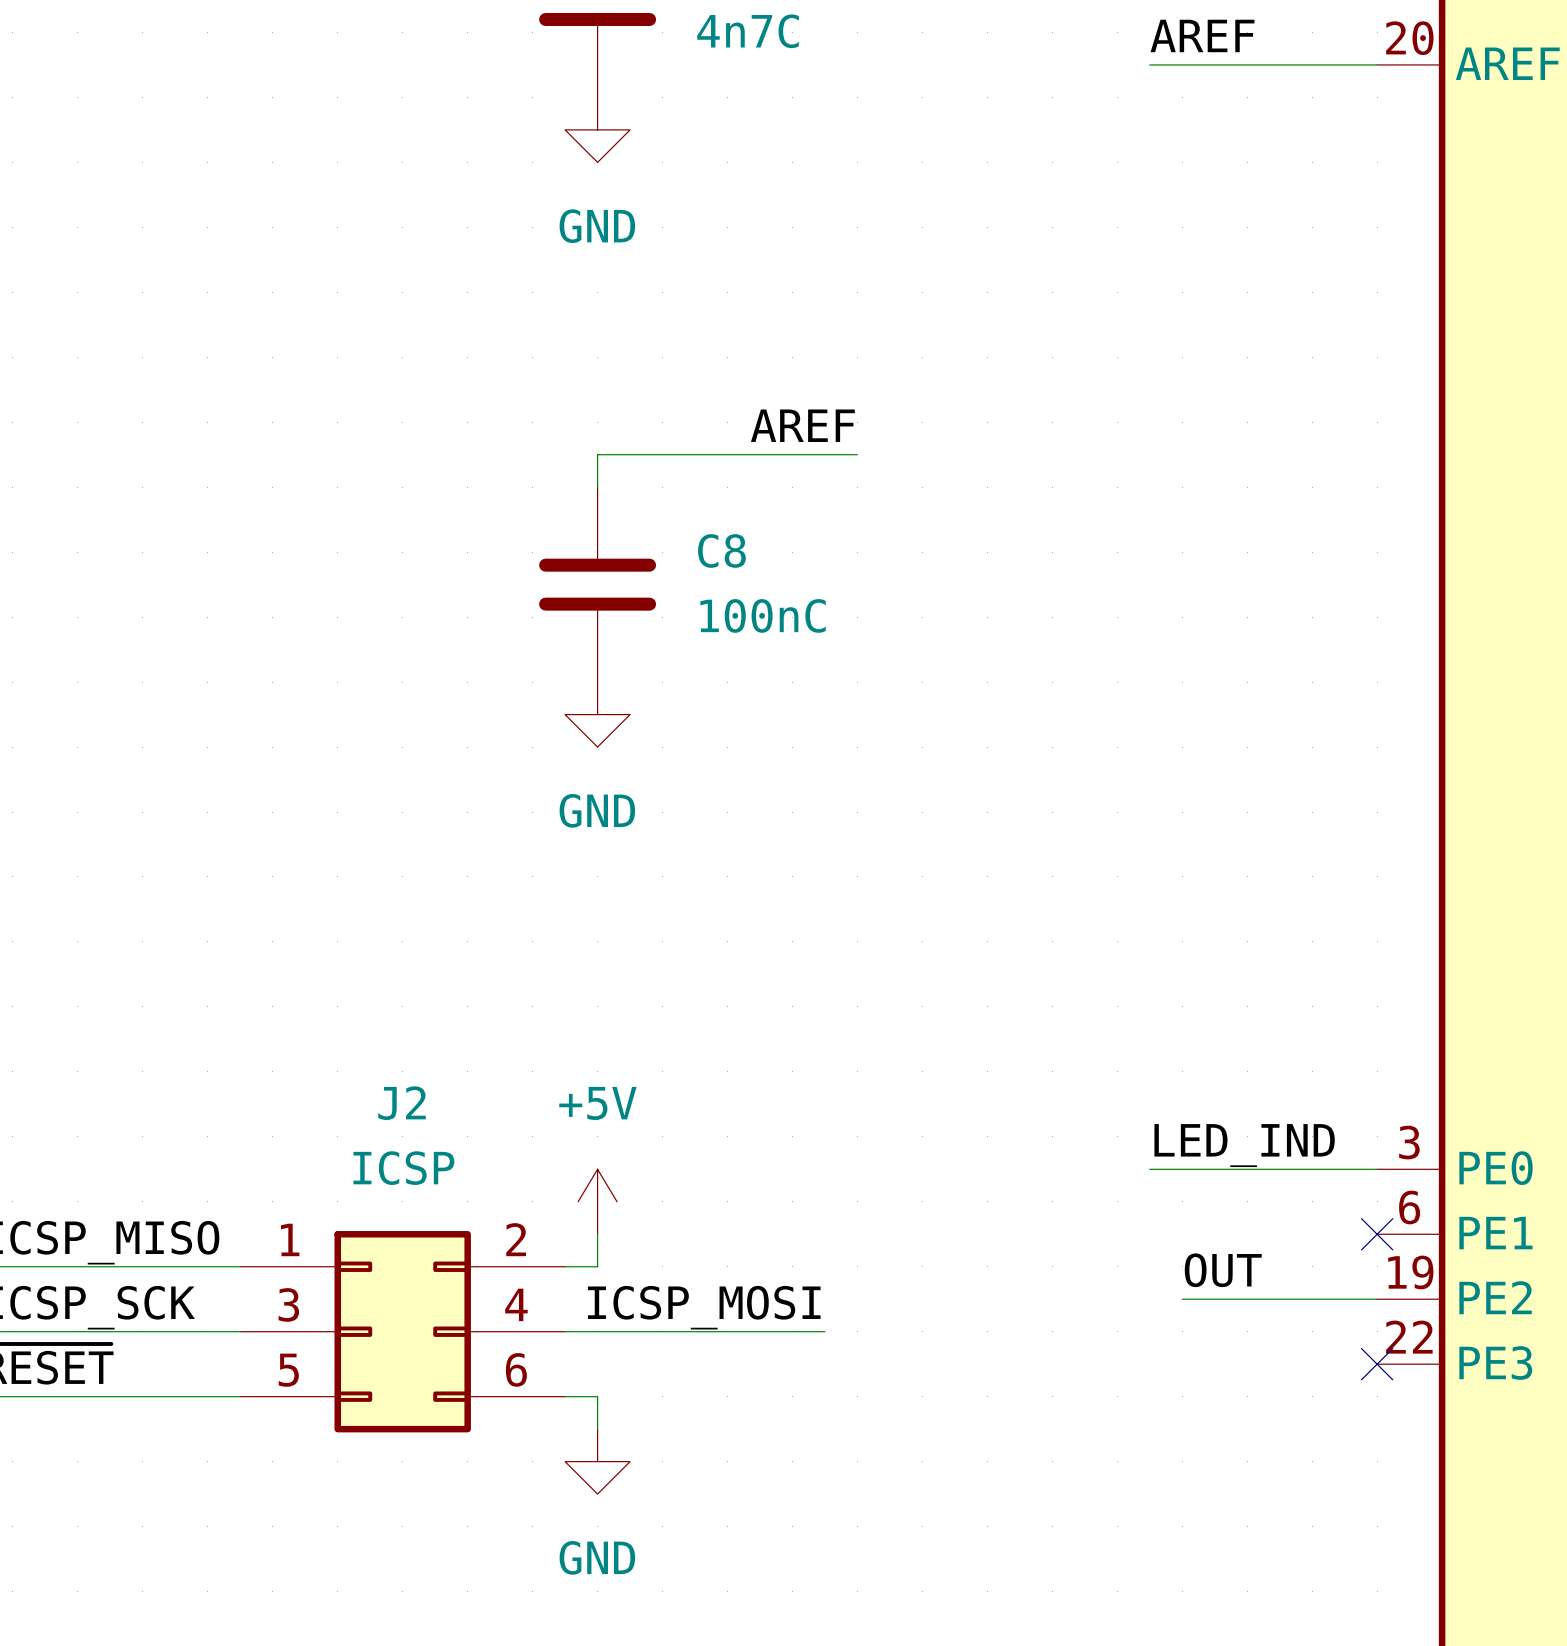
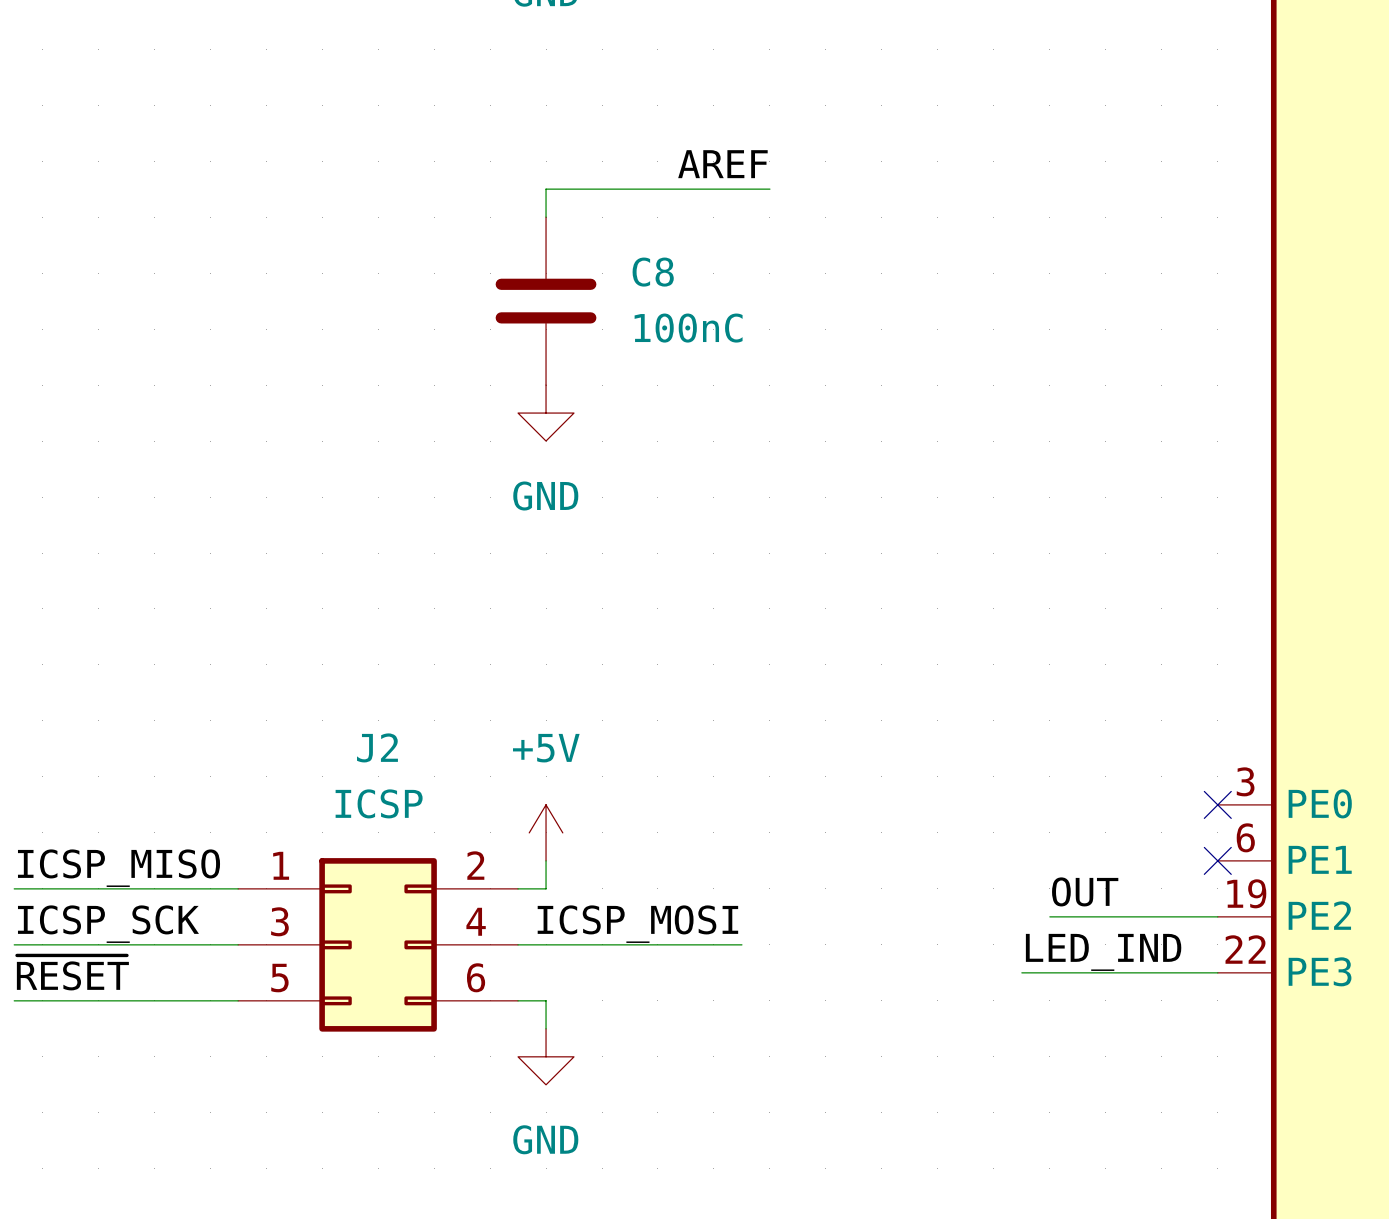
label position: LED_IND (1244, 1145) -> LED_IND (1103, 952)
wire: (1149, 1169) (1377, 1169) -> (1021, 972) (1217, 972)
no-connect mark: none -> (1217, 804)
no-connect mark: (1377, 1364) -> none

